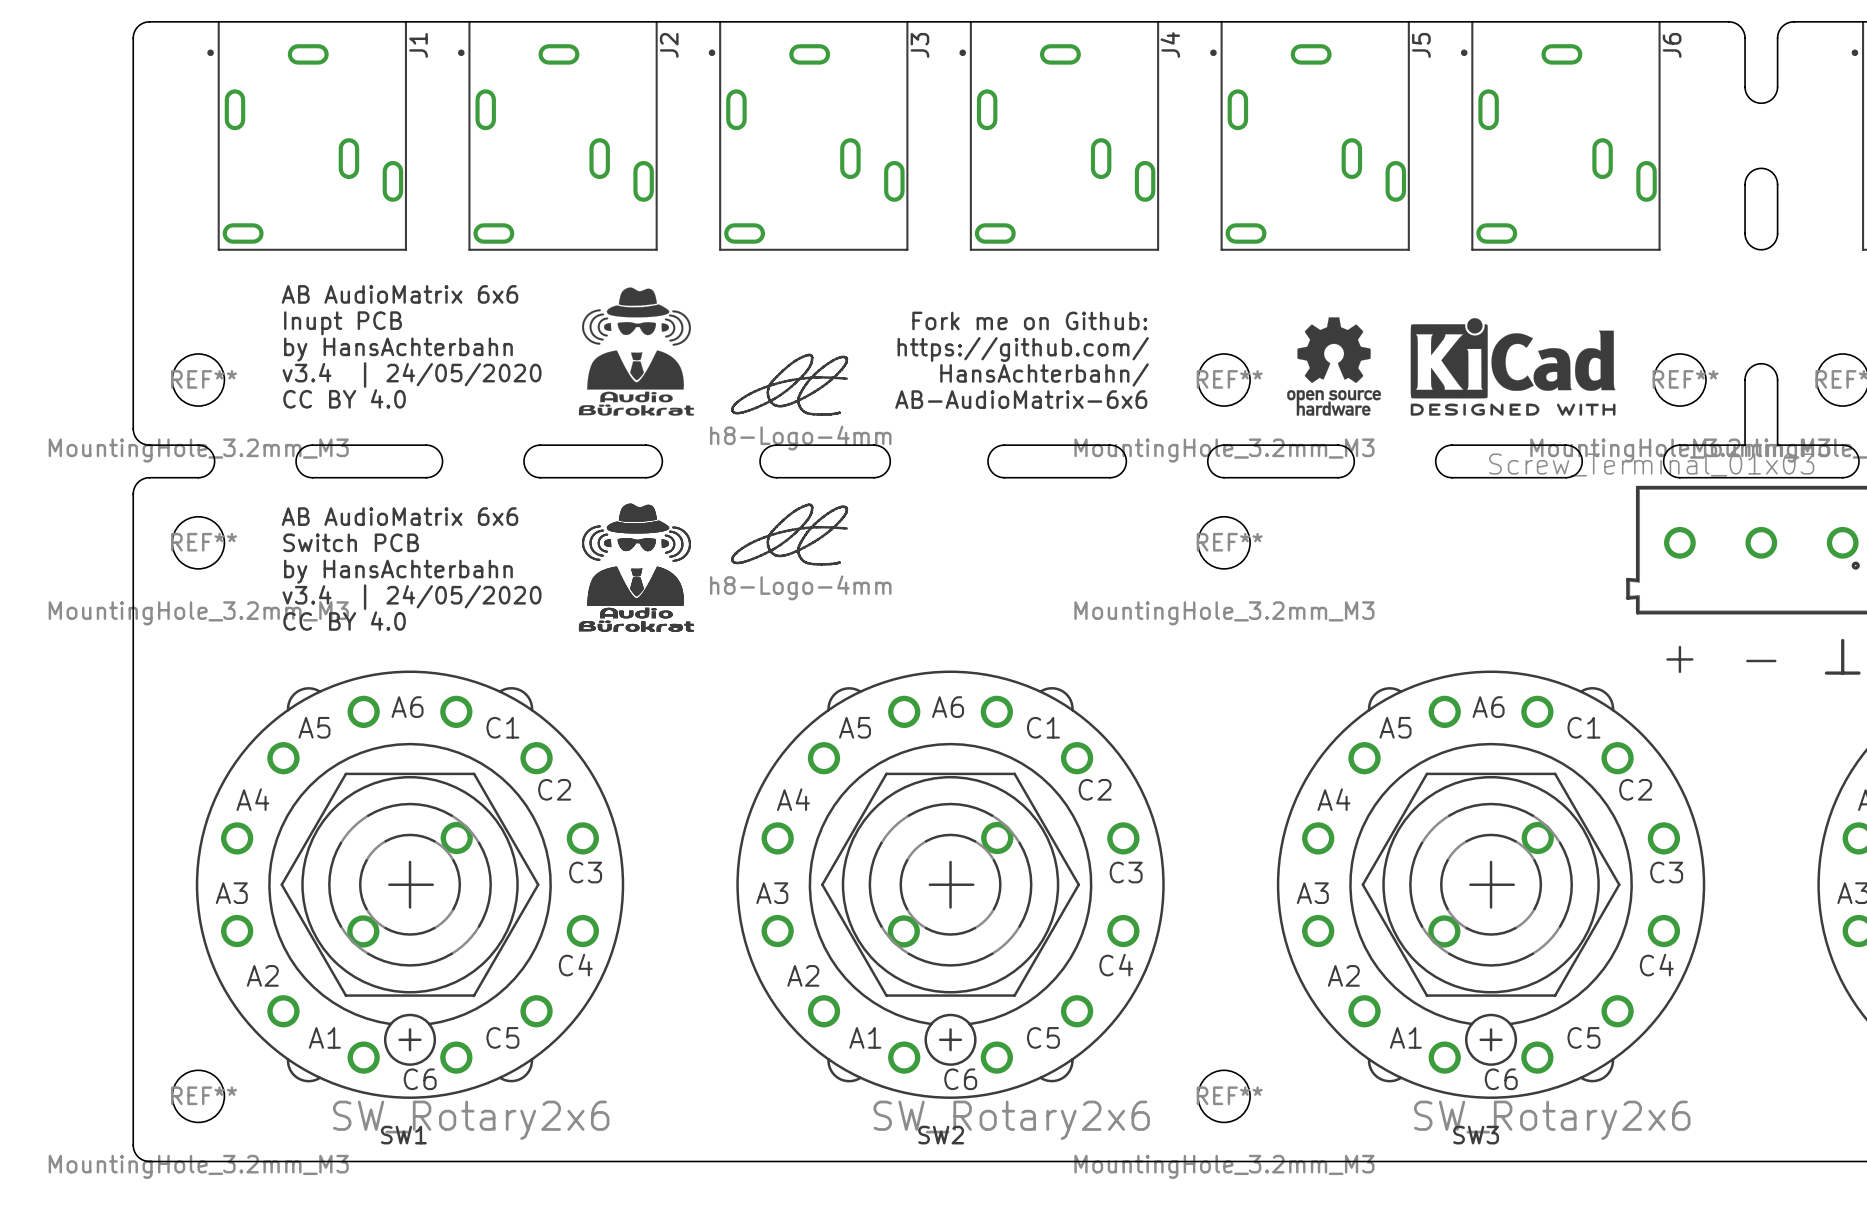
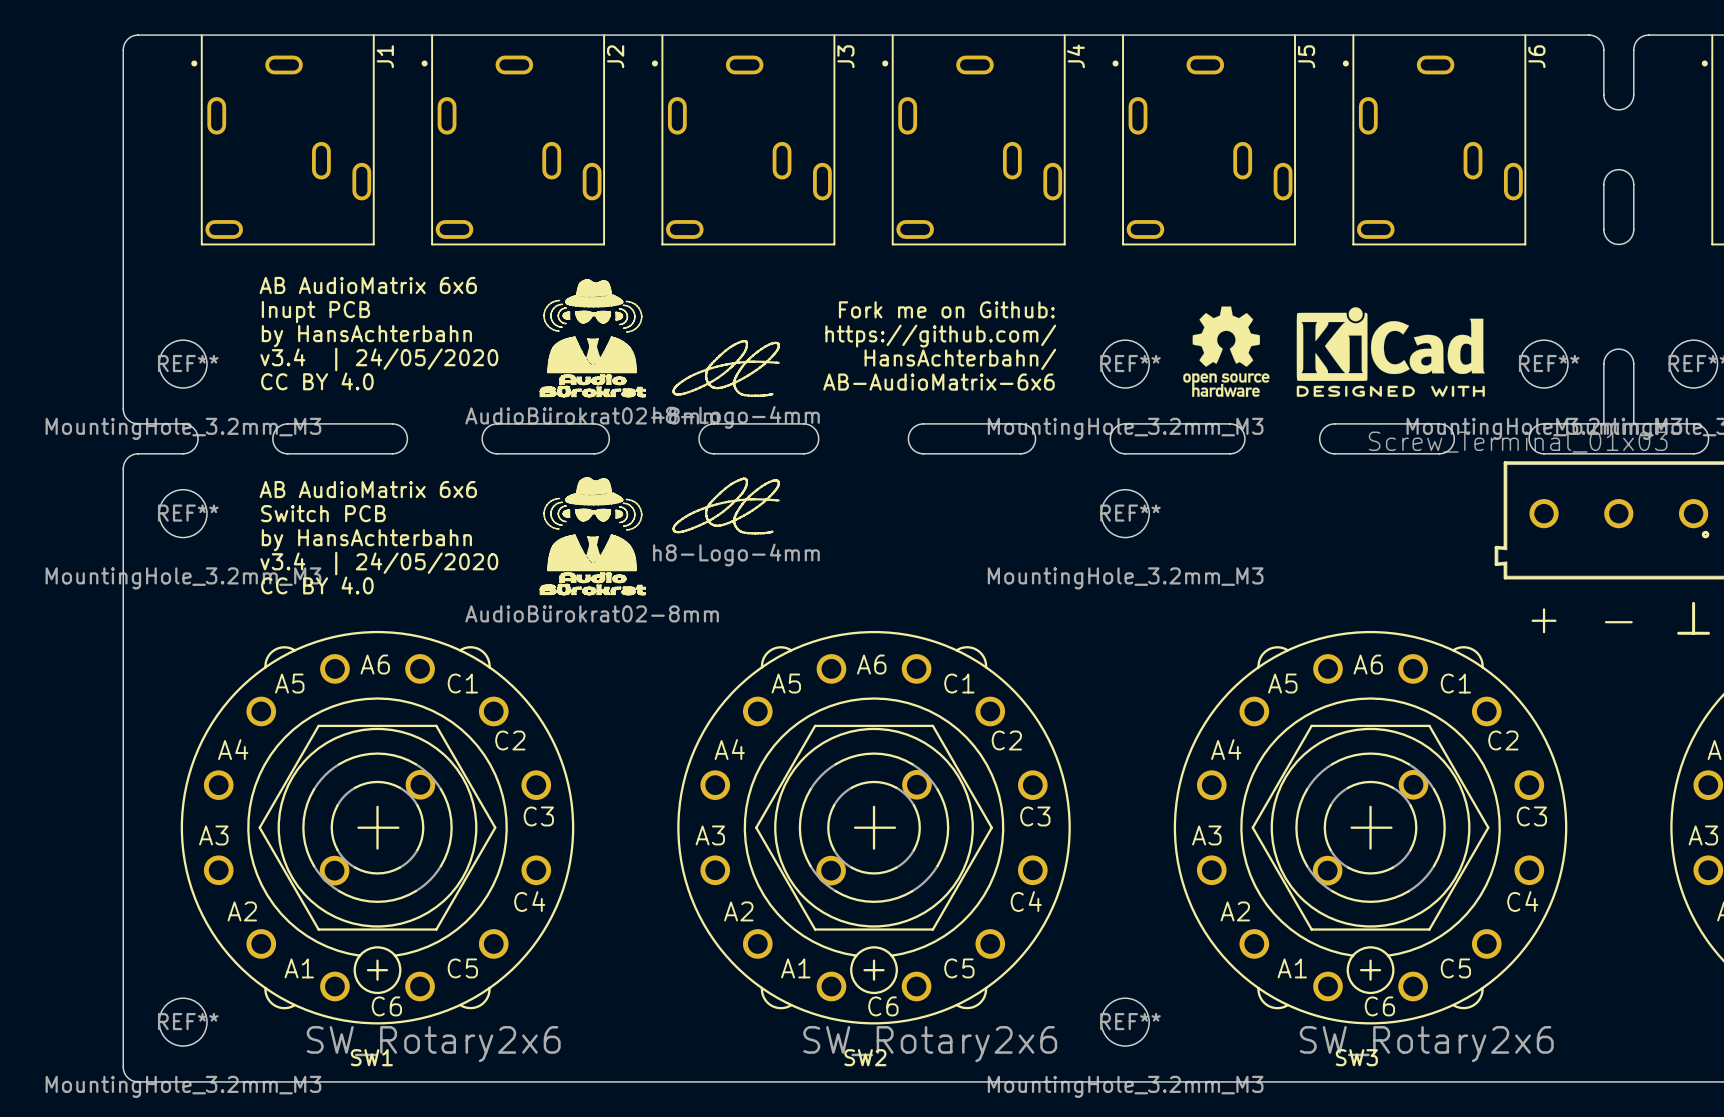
drawing shape: [578, 287, 694, 416] -> [465, 279, 719, 425]
drawing: [578, 503, 694, 632] -> none
drawing: none -> [540, 477, 646, 595]

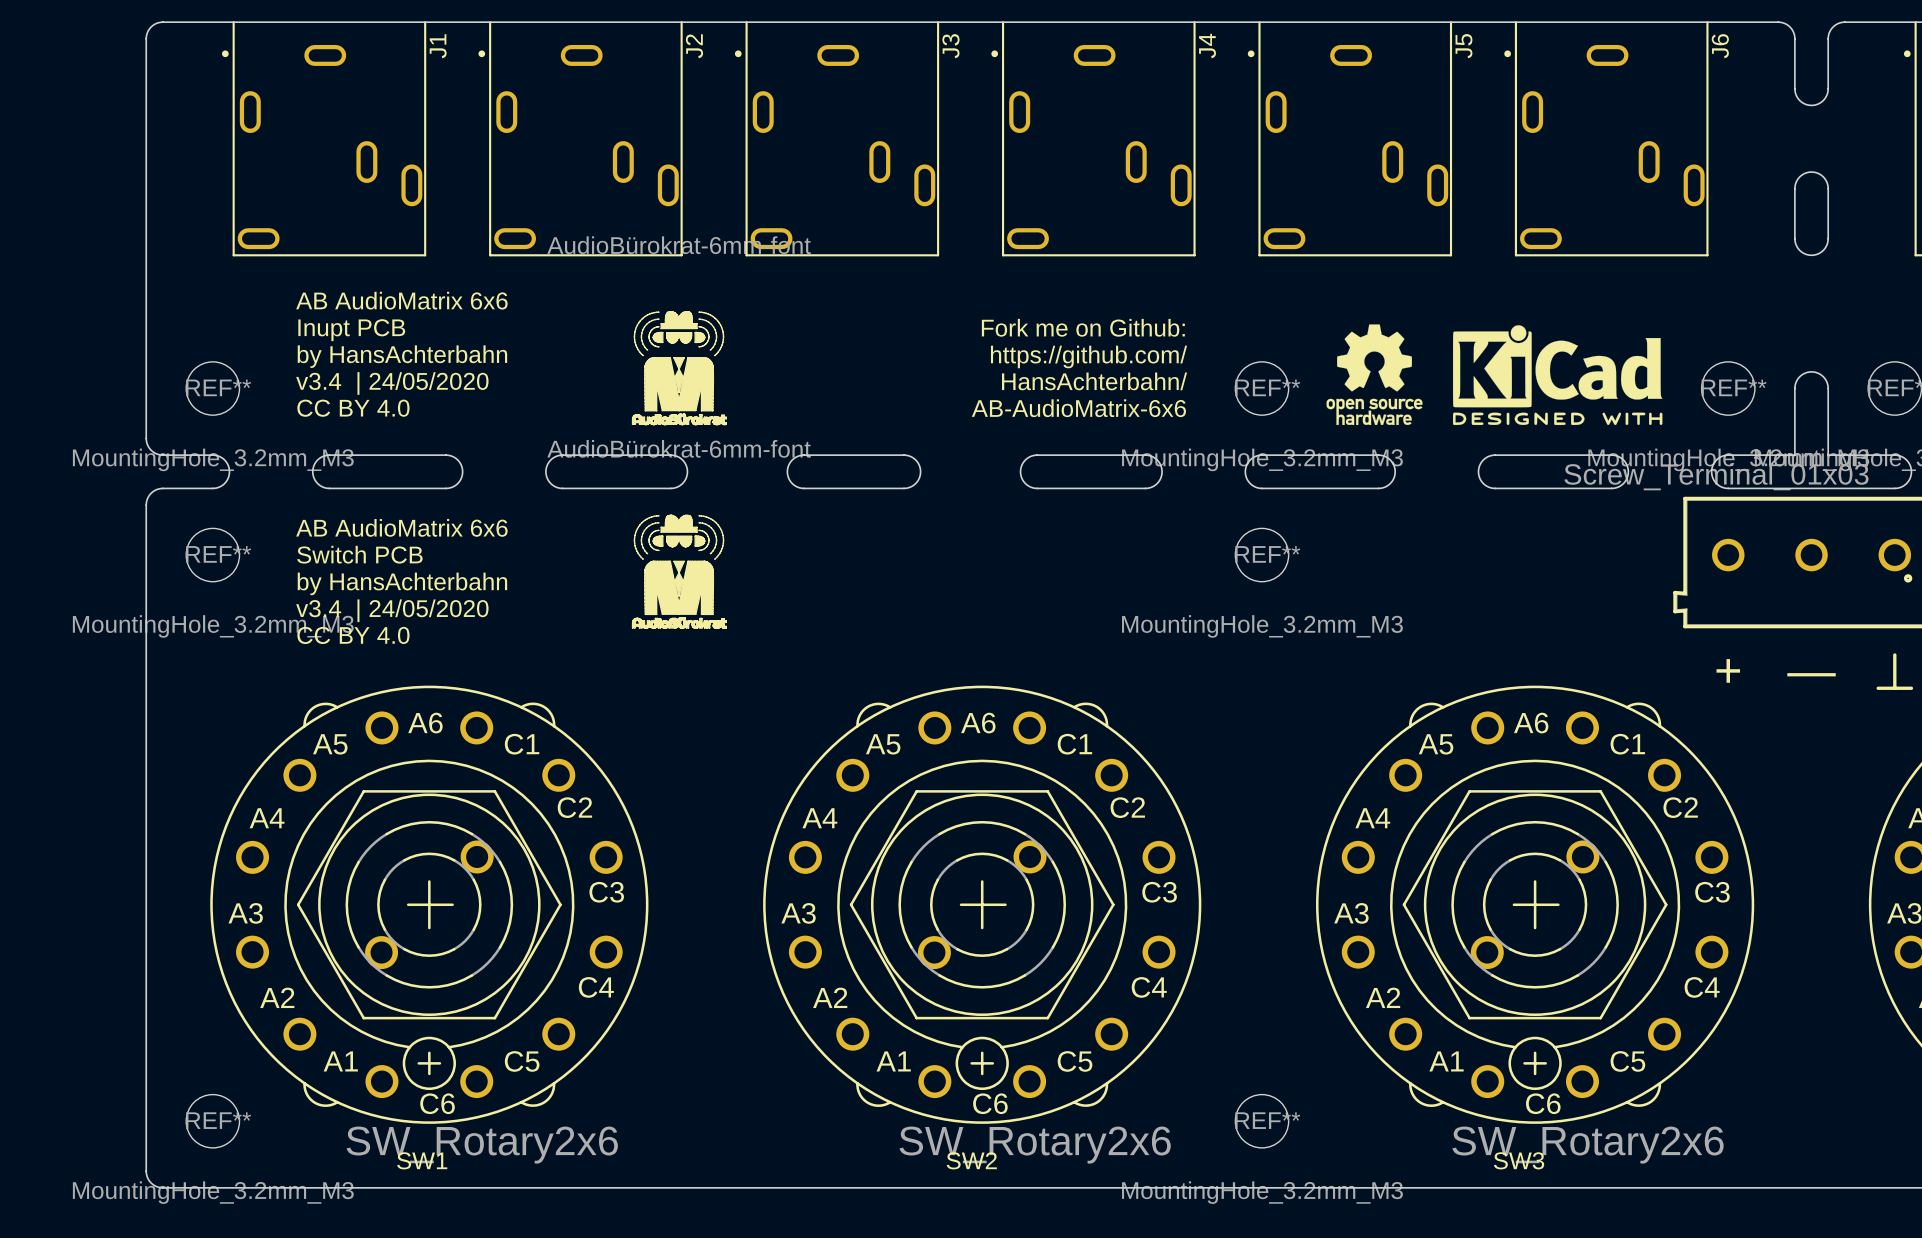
drawing shape: [465, 279, 719, 425] -> [547, 236, 811, 426]
drawing: [672, 339, 780, 397] -> none
drawing shape: [465, 477, 719, 623] -> [547, 439, 811, 629]
drawing: [672, 477, 780, 535] -> none

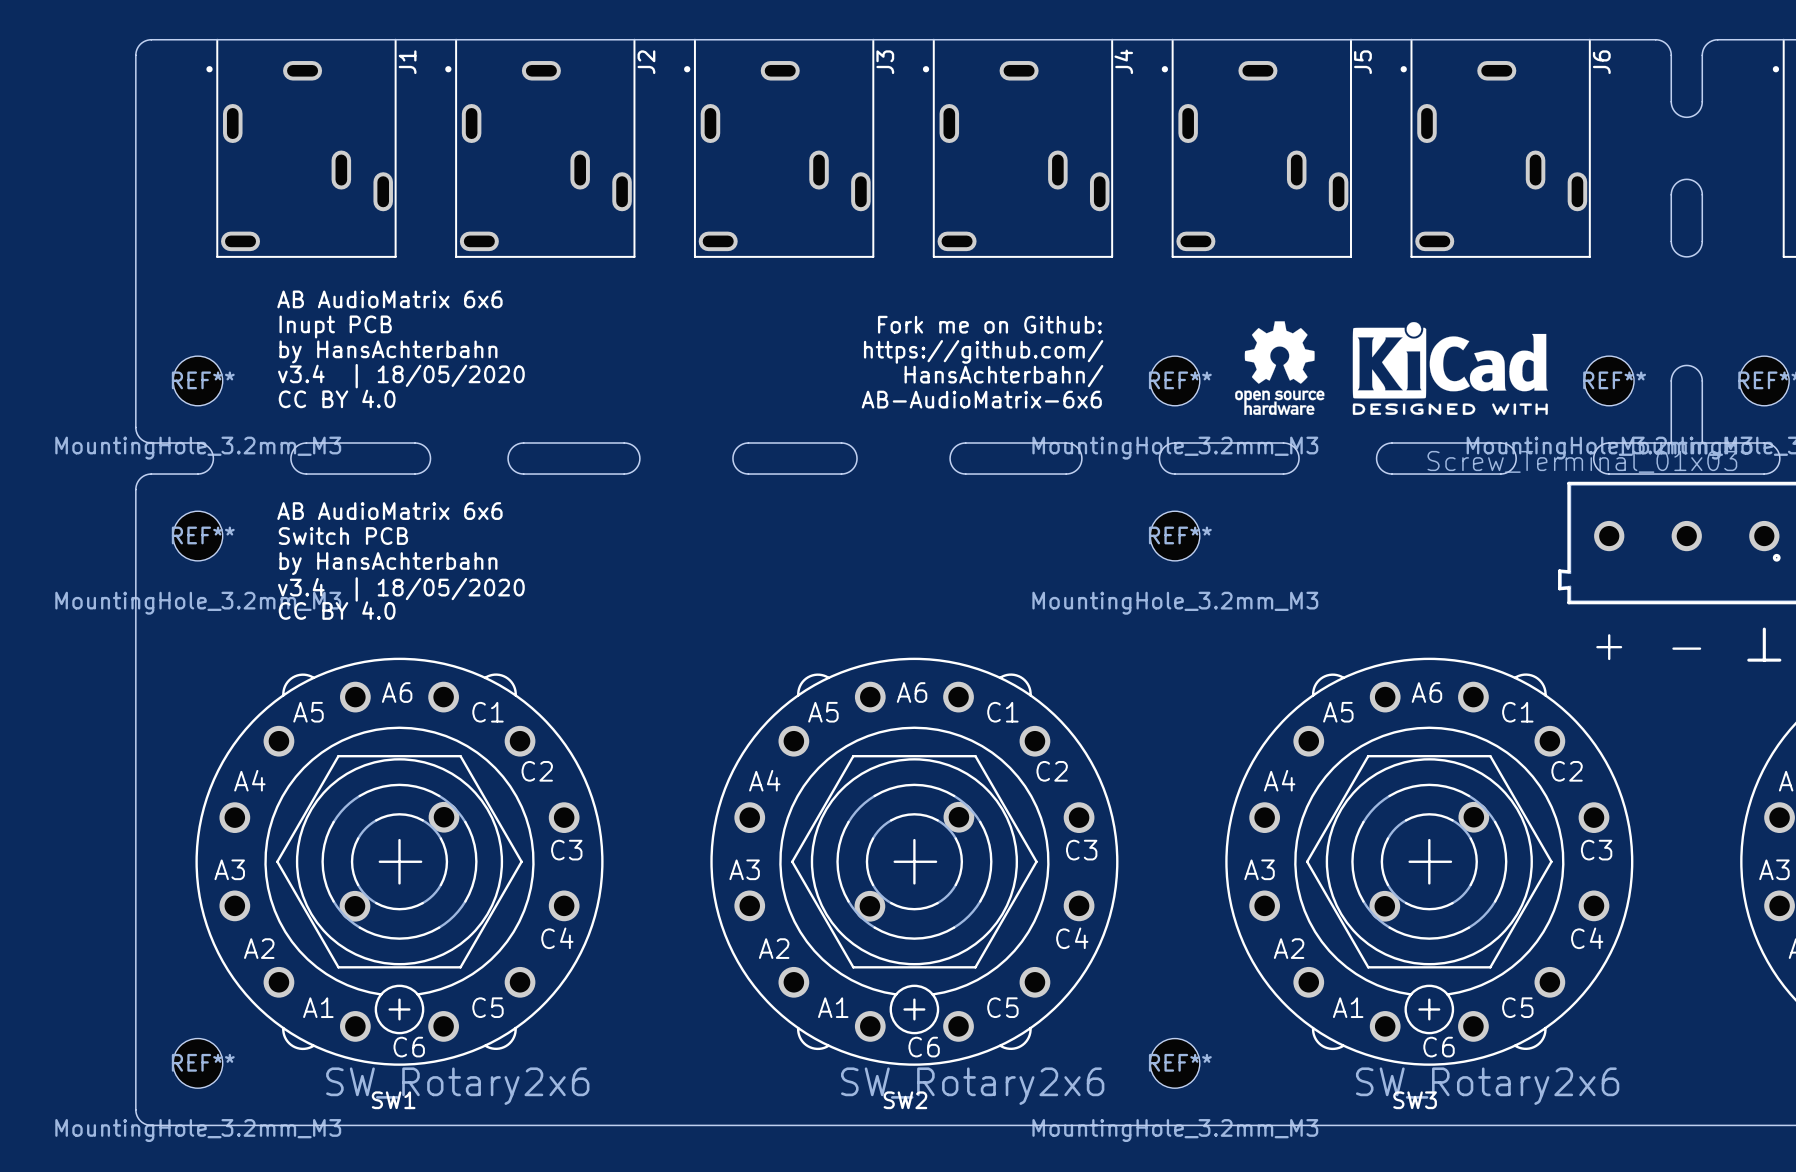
drawing: [632, 311, 727, 629] -> none
text: v3.4 | 24/05/2020 (392, 383) -> v3.4 | 18/05/2020 (401, 376)
text: v3.4 | 24/05/2020 (392, 610) -> v3.4 | 18/05/2020 (401, 589)

